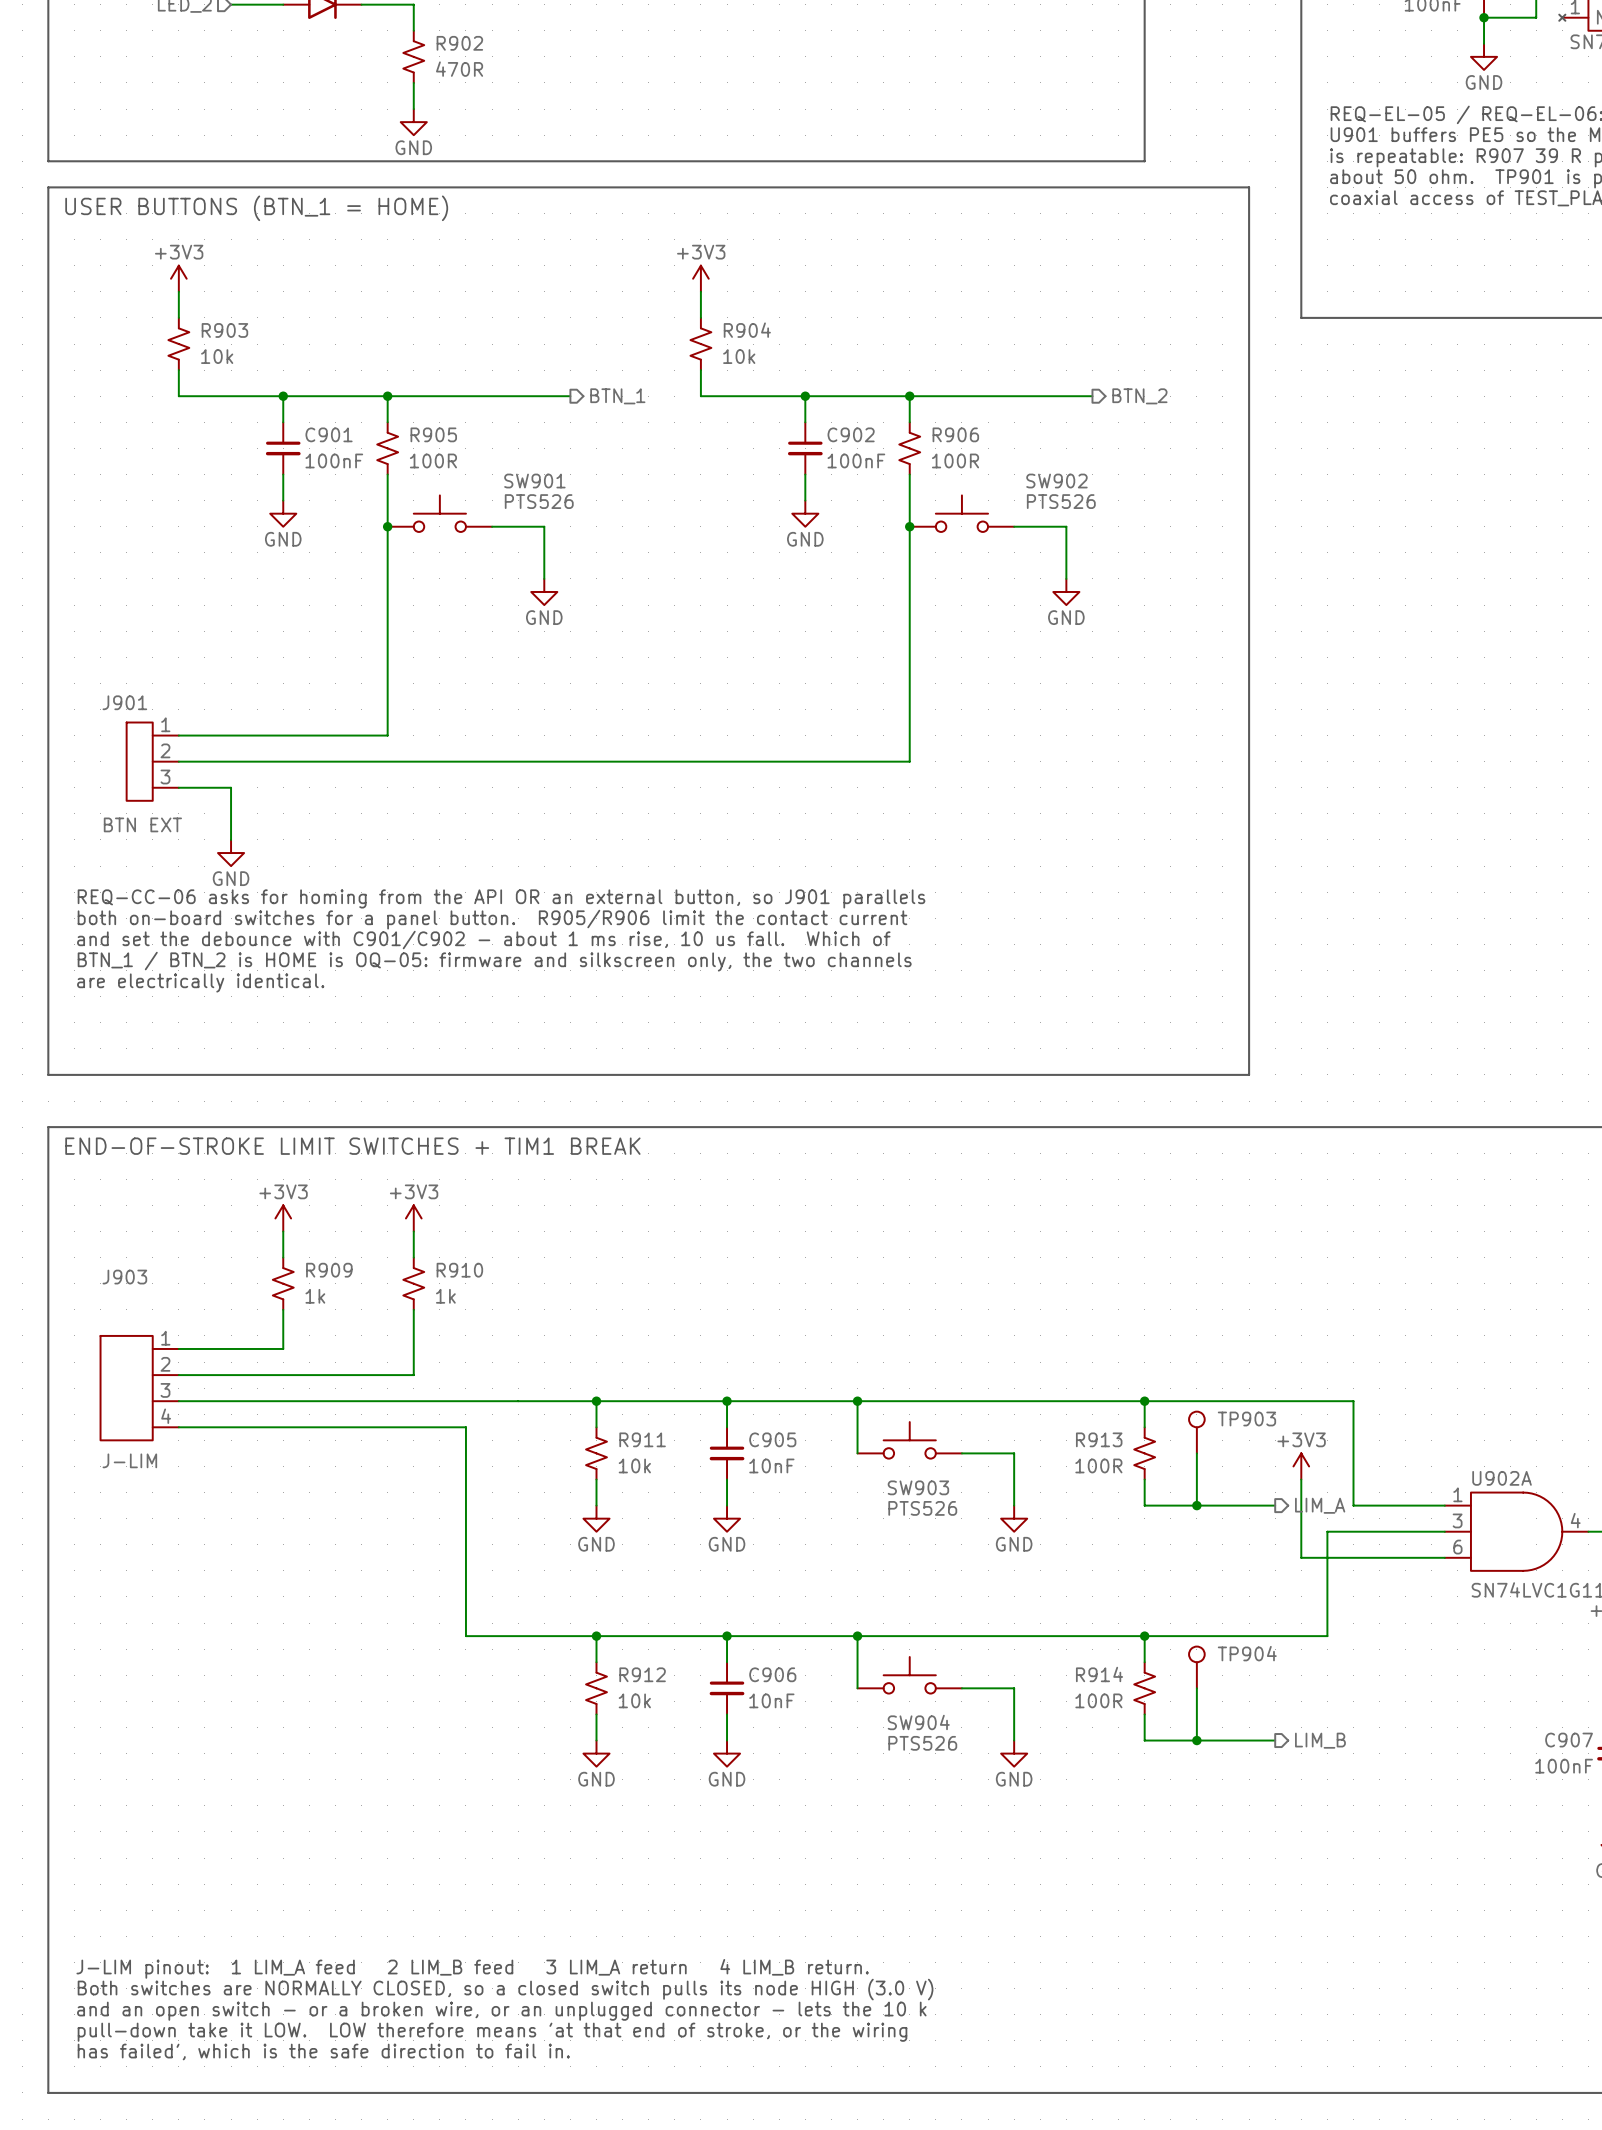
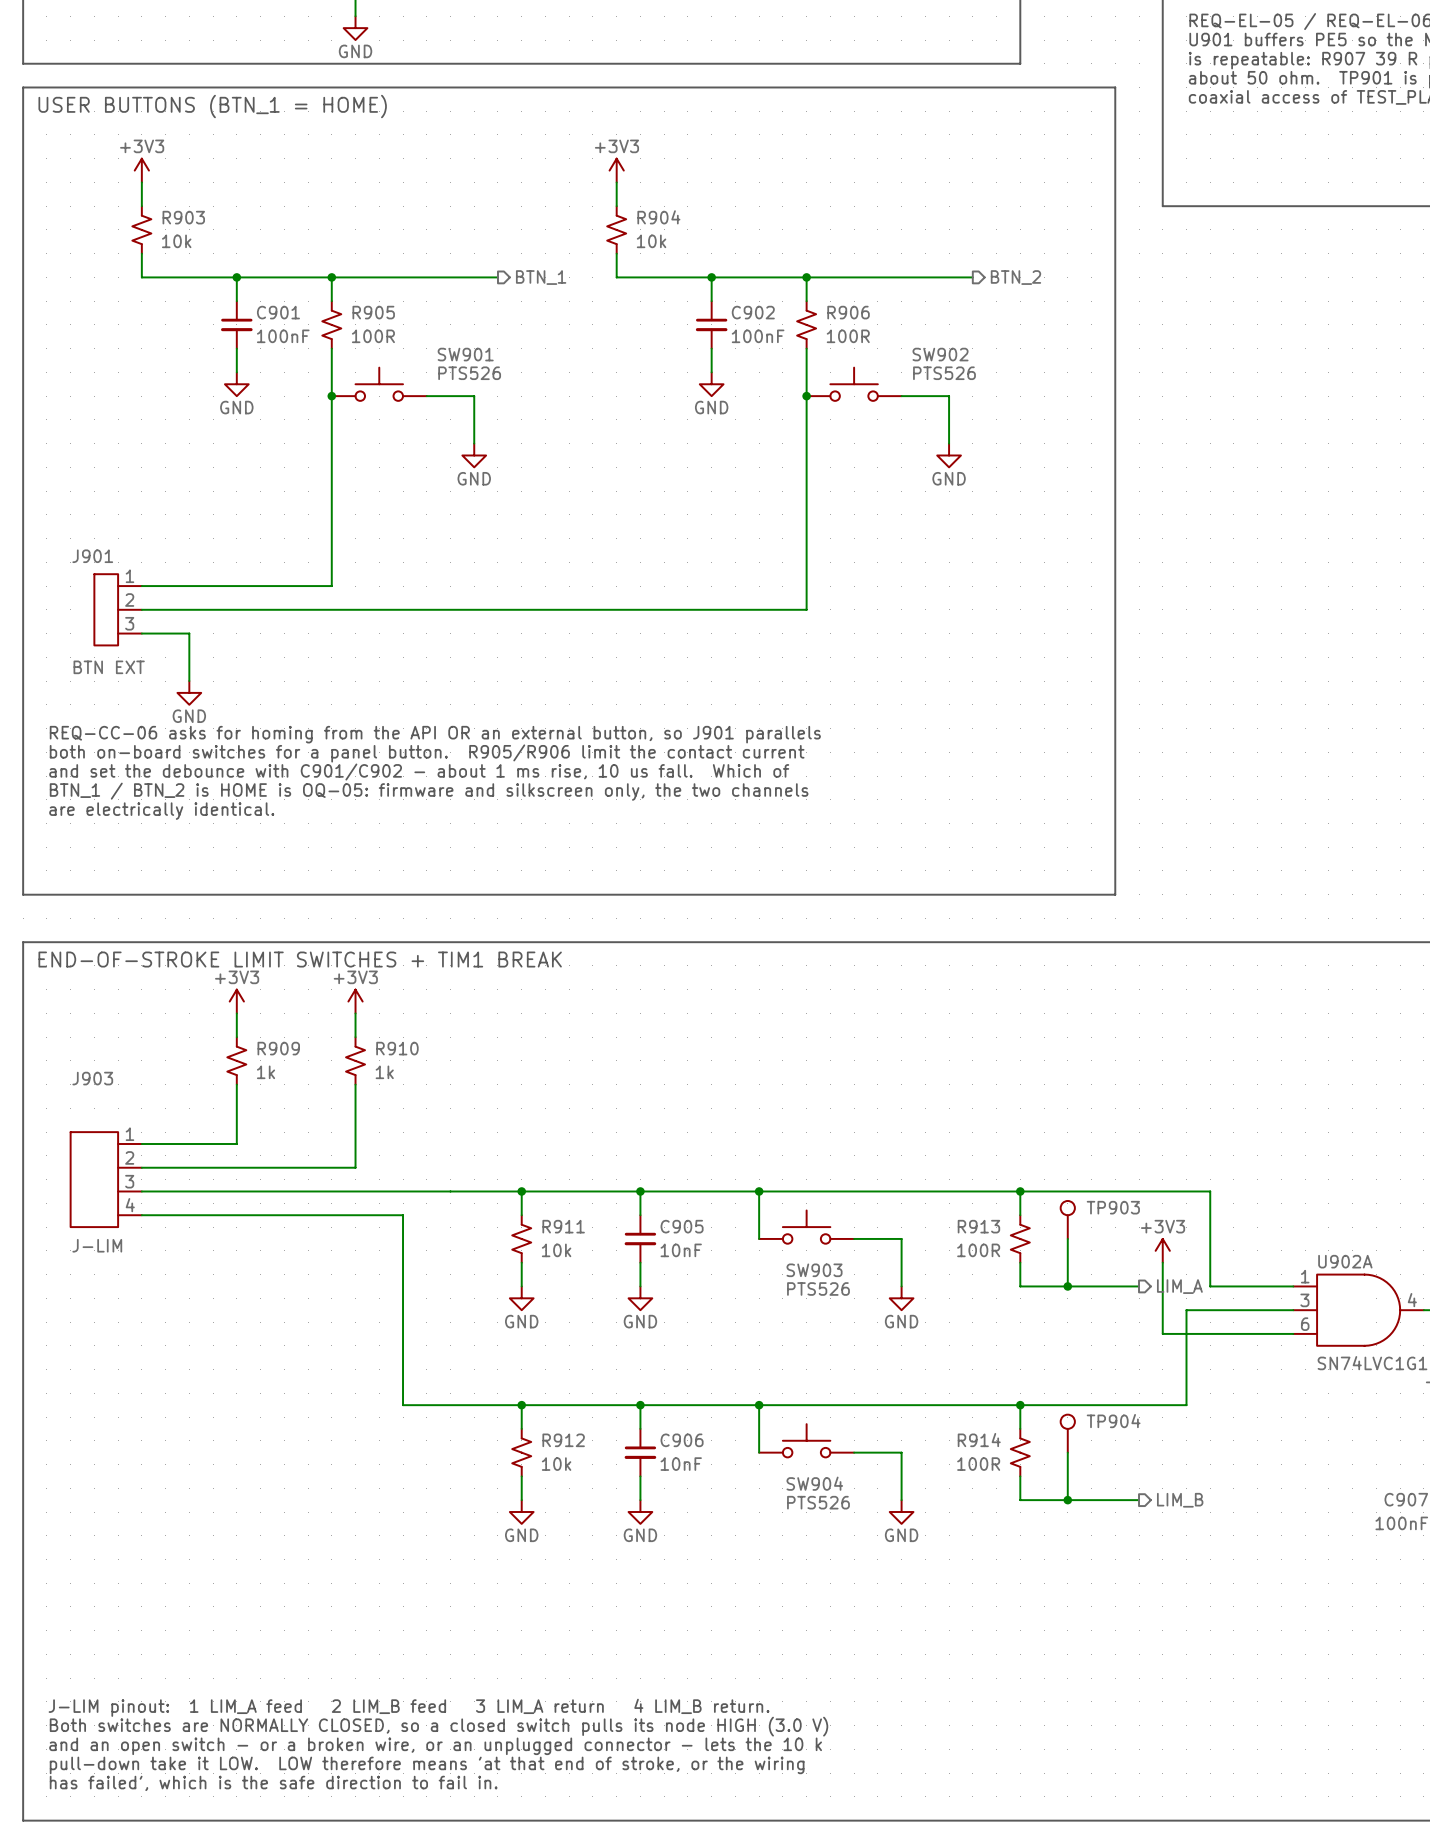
power symbol position: +3V3 (283, 1218) -> +3V3 (236, 1001)
power symbol position: +3V3 (413, 1218) -> +3V3 (355, 1001)
R909 position: (283, 1283) -> (236, 1060)
R910 position: (413, 1283) -> (355, 1060)

